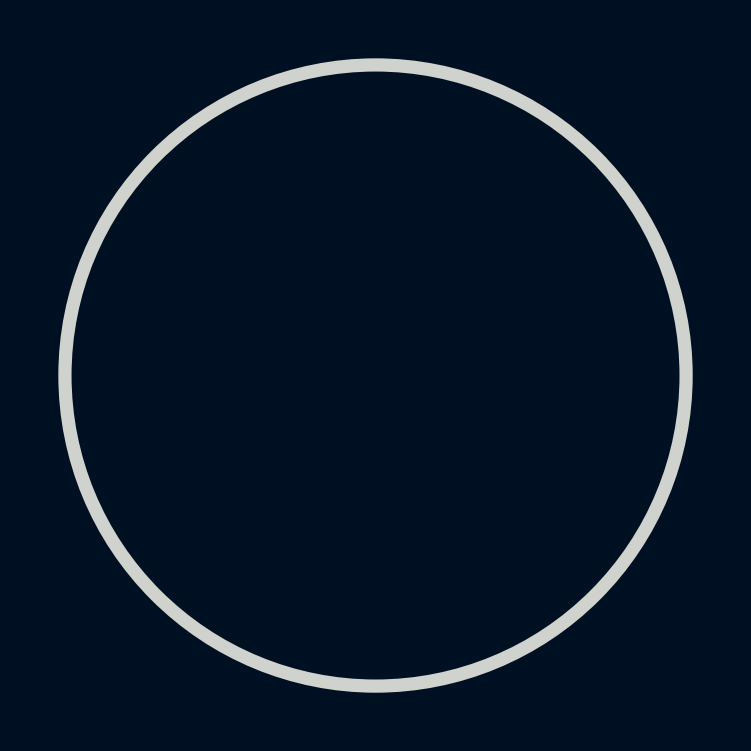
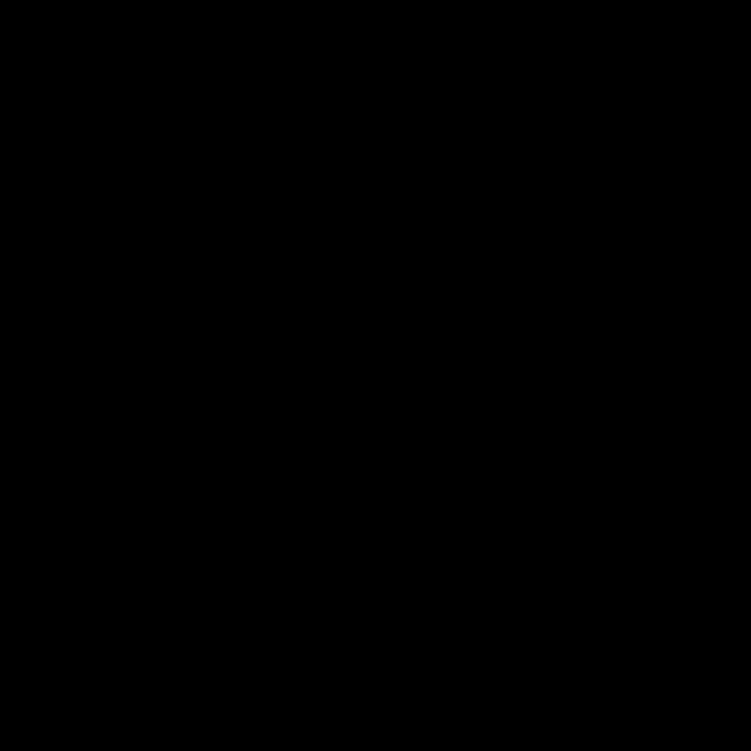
round board edge: [58, 58, 693, 693] -> none

